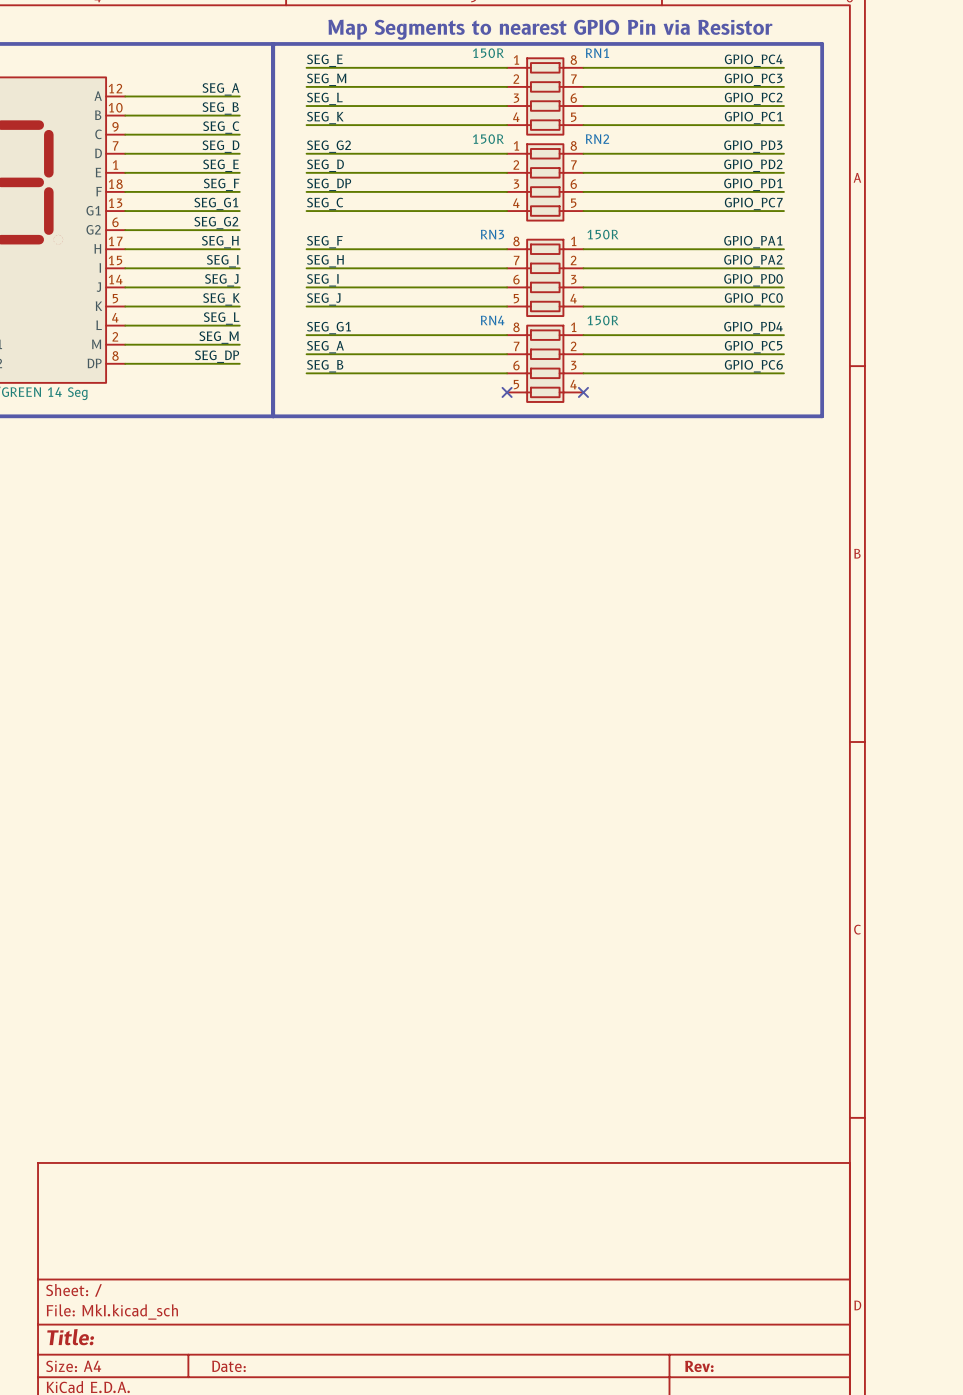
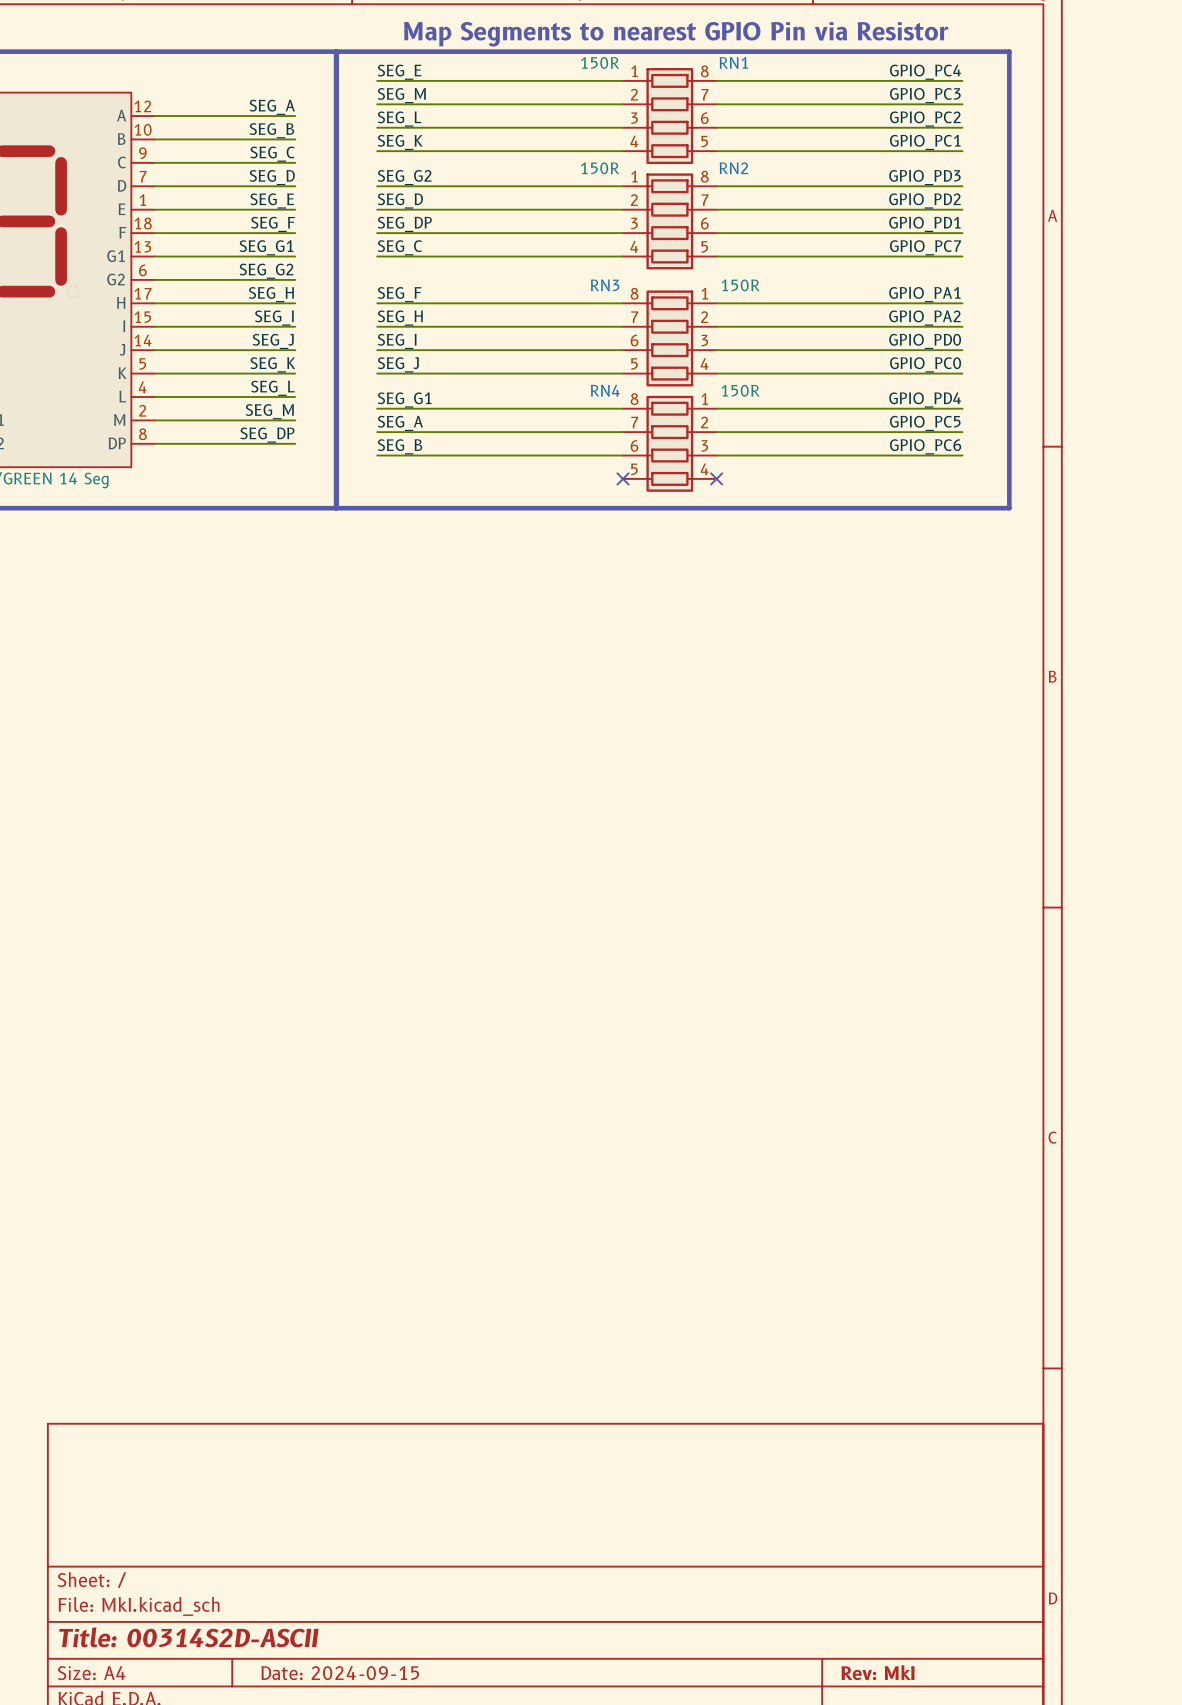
title block: Title: (70, 1337) -> Title: 00314S2D-ASCII (188, 1637)
title block: Date: (228, 1366) -> Date: 2024-09-15 (340, 1673)
title block: Rev: (699, 1366) -> Rev: MkI (877, 1672)

